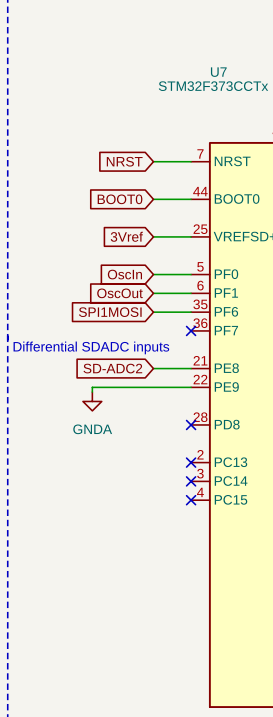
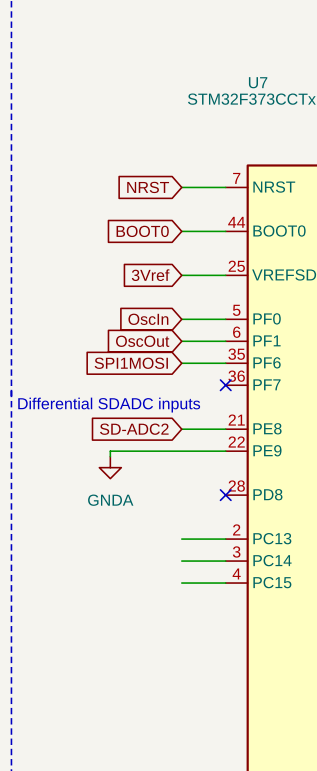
wire: none -> (181, 539) (225, 539)
no-connect mark: (191, 462) -> none
wire: none -> (181, 561) (225, 561)
no-connect mark: (191, 481) -> none
wire: none -> (181, 583) (225, 583)
no-connect mark: (191, 500) -> none

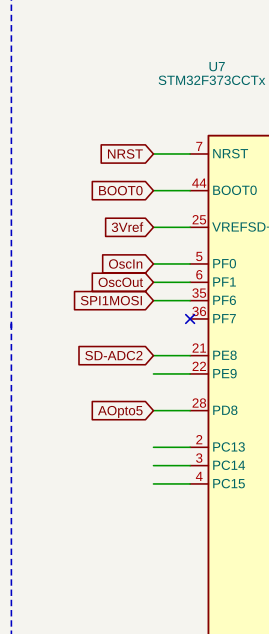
text: Differential SDADC inputs (109, 405) -> none
wire: (181, 451) (110, 451) (110, 456) -> none
power symbol: GNDA (110, 467) -> none
wire: none -> (153, 410) (190, 410)
no-connect mark: (225, 495) -> none
global label: none -> AOpto5 (120, 411)

